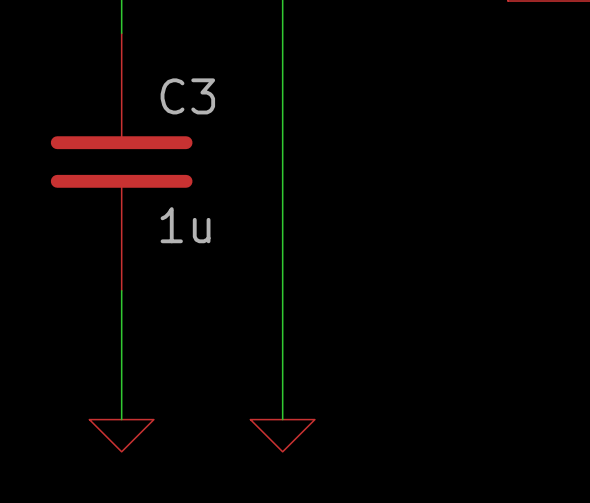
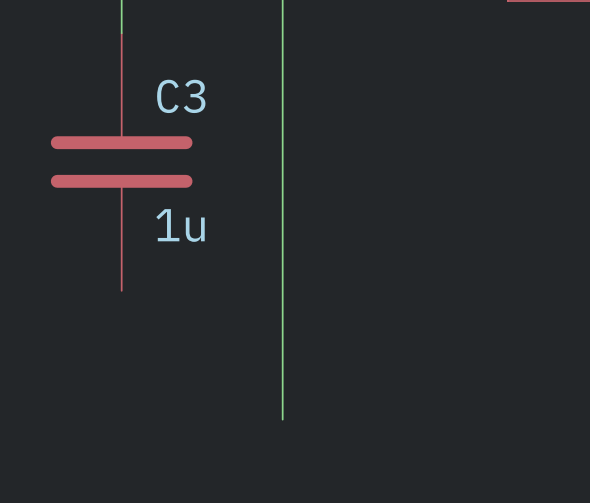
wire: (121, 290) (121, 419) -> none
power symbol: (121, 435) -> none
power symbol: (282, 435) -> none

